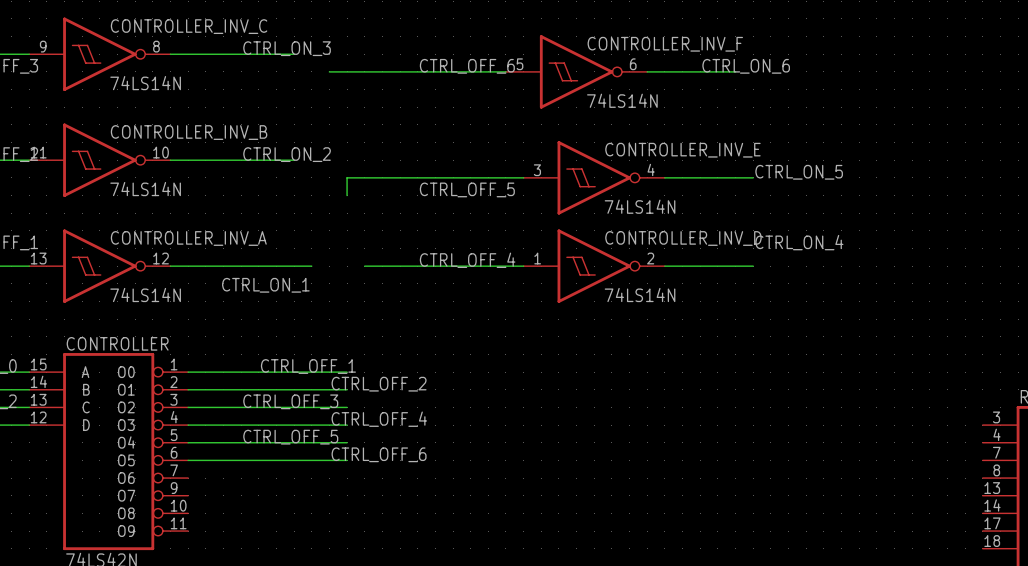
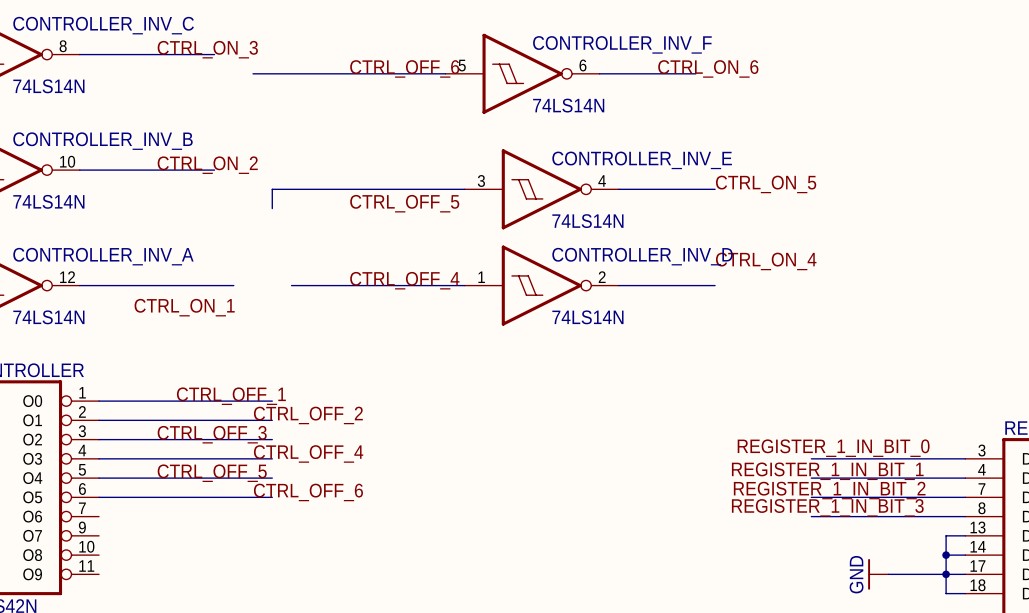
label: none -> REGISTER_1_IN_BIT_0 (833, 448)
wire: none -> (811, 458) (965, 458)
label: none -> REGISTER_1_IN_BIT_1 (827, 471)
wire: none -> (811, 478) (965, 478)
label: none -> REGISTER_1_IN_BIT_2 (829, 490)
wire: none -> (811, 497) (965, 497)
label: none -> REGISTER_1_IN_BIT_3 (827, 507)
wire: none -> (811, 516) (965, 516)
wire: none -> (965, 535) (946, 535) (946, 593) (965, 593)
wire: none -> (946, 555) (965, 555)
junction: none -> (946, 555)
power symbol: none -> GND (878, 574)
wire: none -> (888, 574) (965, 574)
junction: none -> (946, 574)

